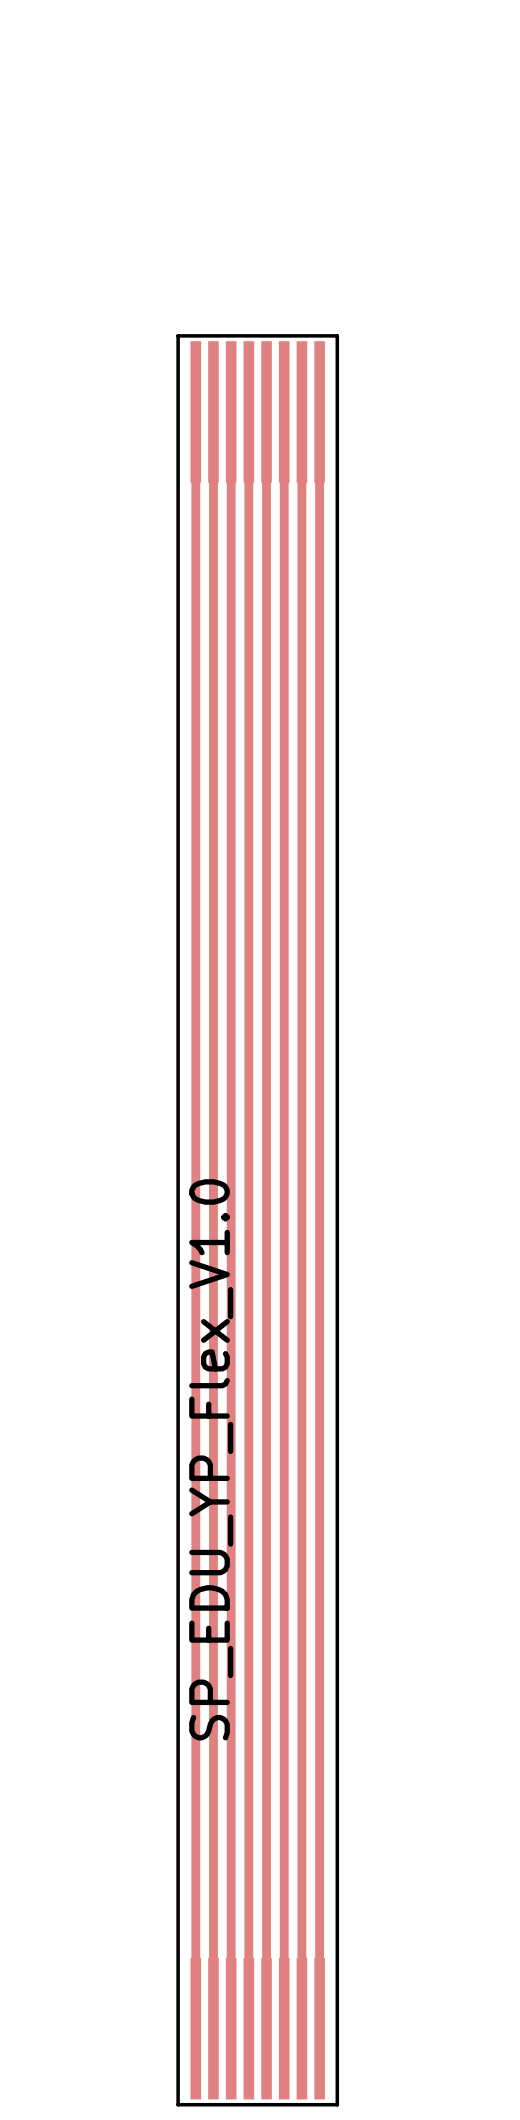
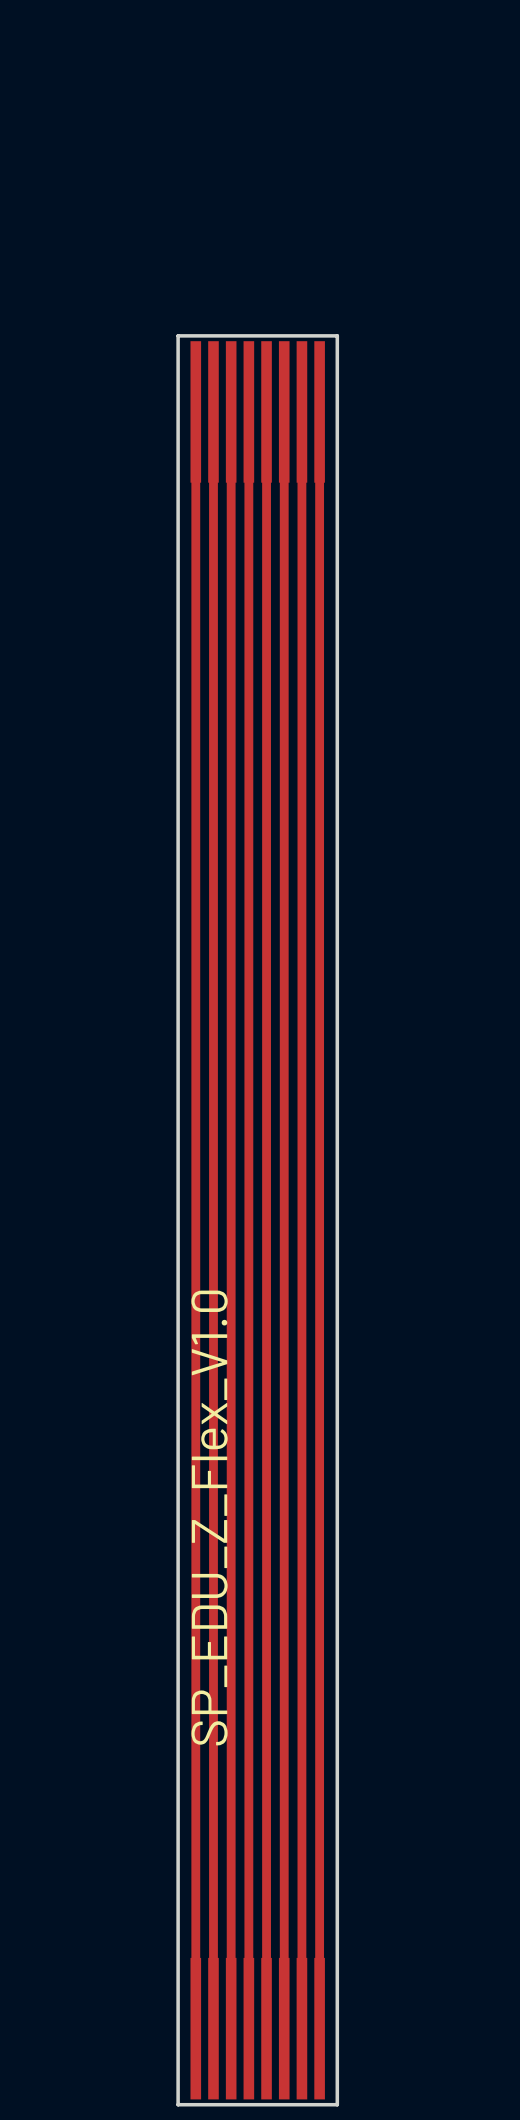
text: SP_EDU_YP_Flex_V1.0 (211, 1459) -> SP_EDU_Z_Flex_V1.0 (209, 1517)

